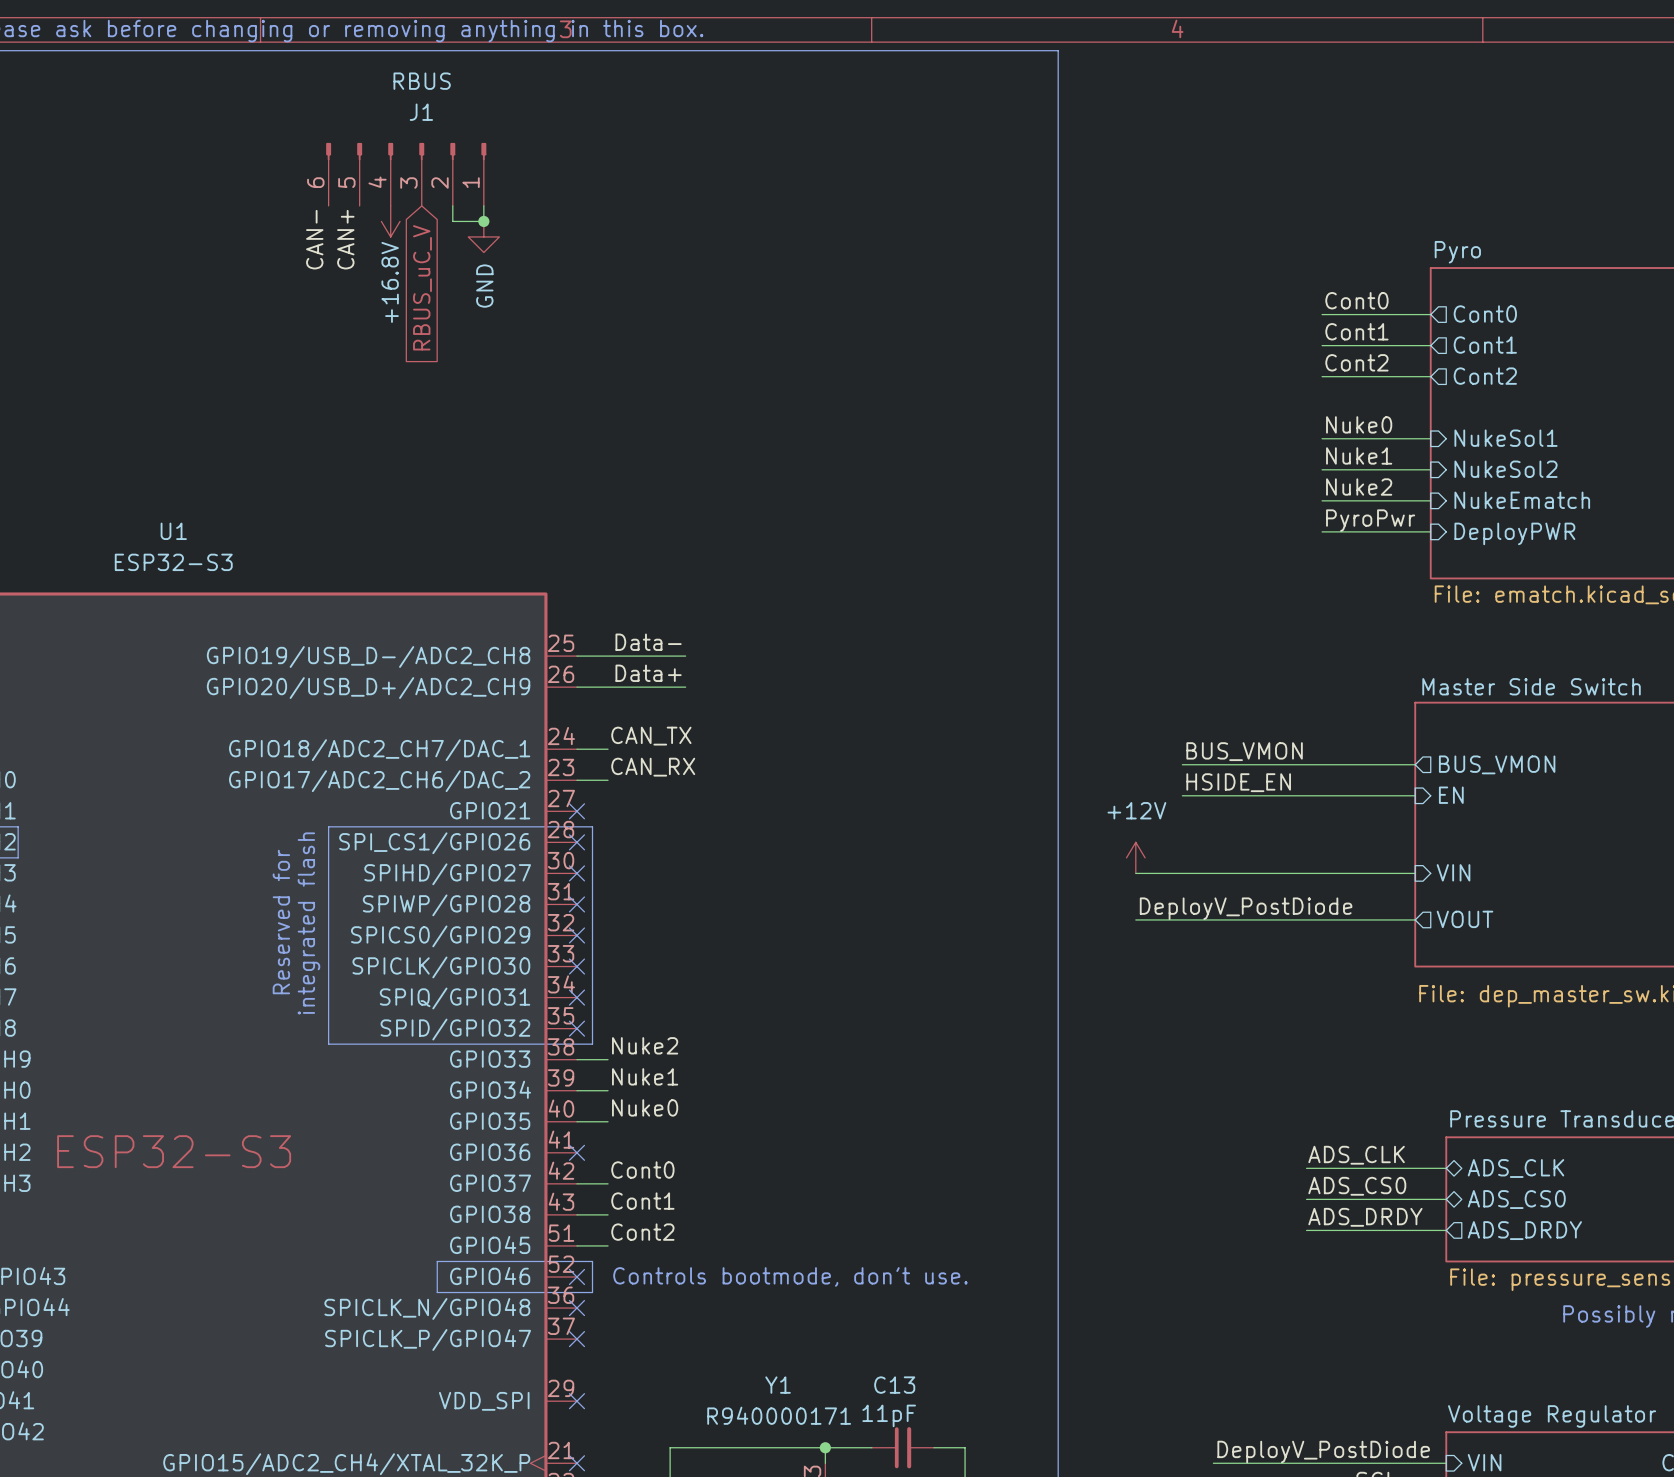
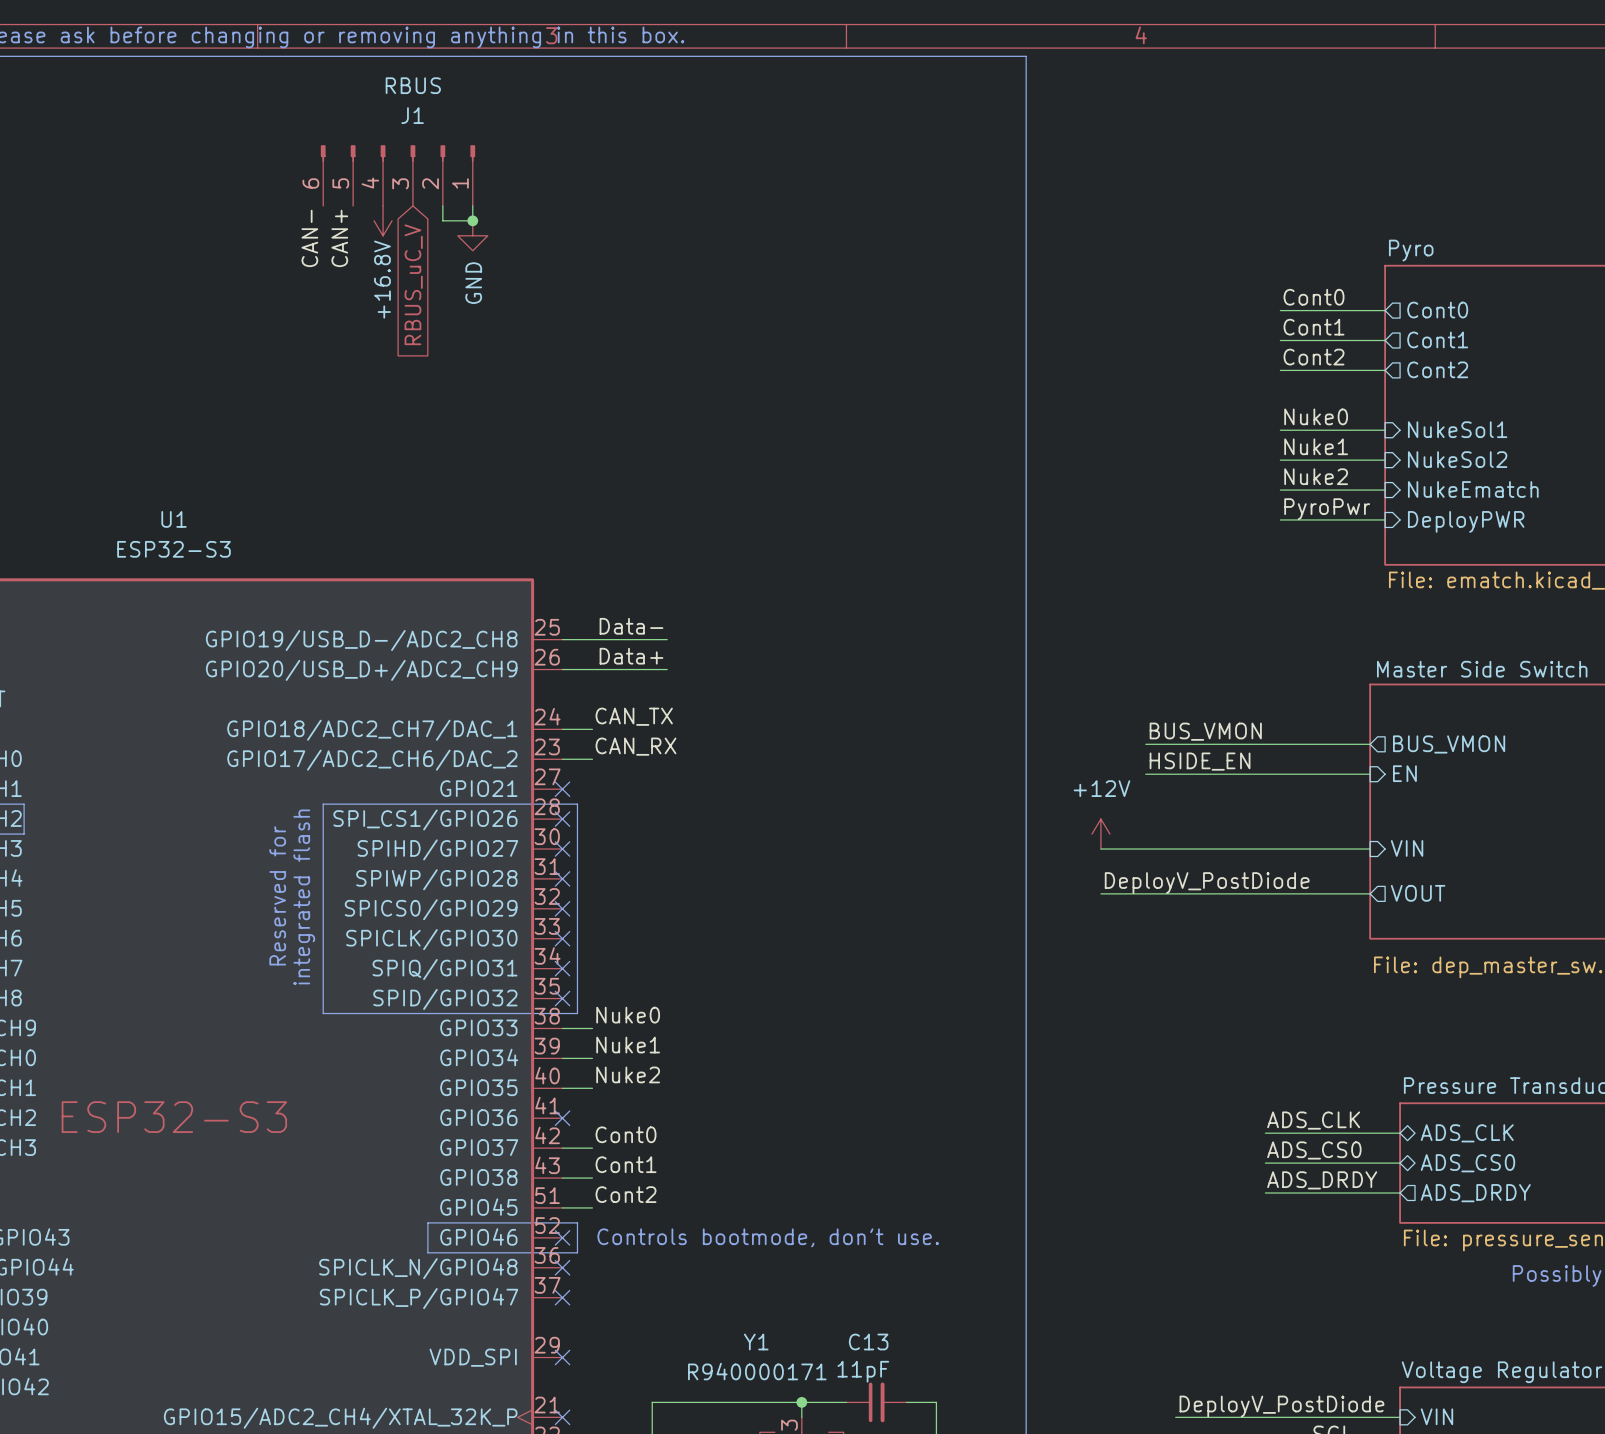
label: Nuke2 (645, 1045) -> Nuke0 (628, 1015)
label: Nuke0 (645, 1107) -> Nuke2 (628, 1074)

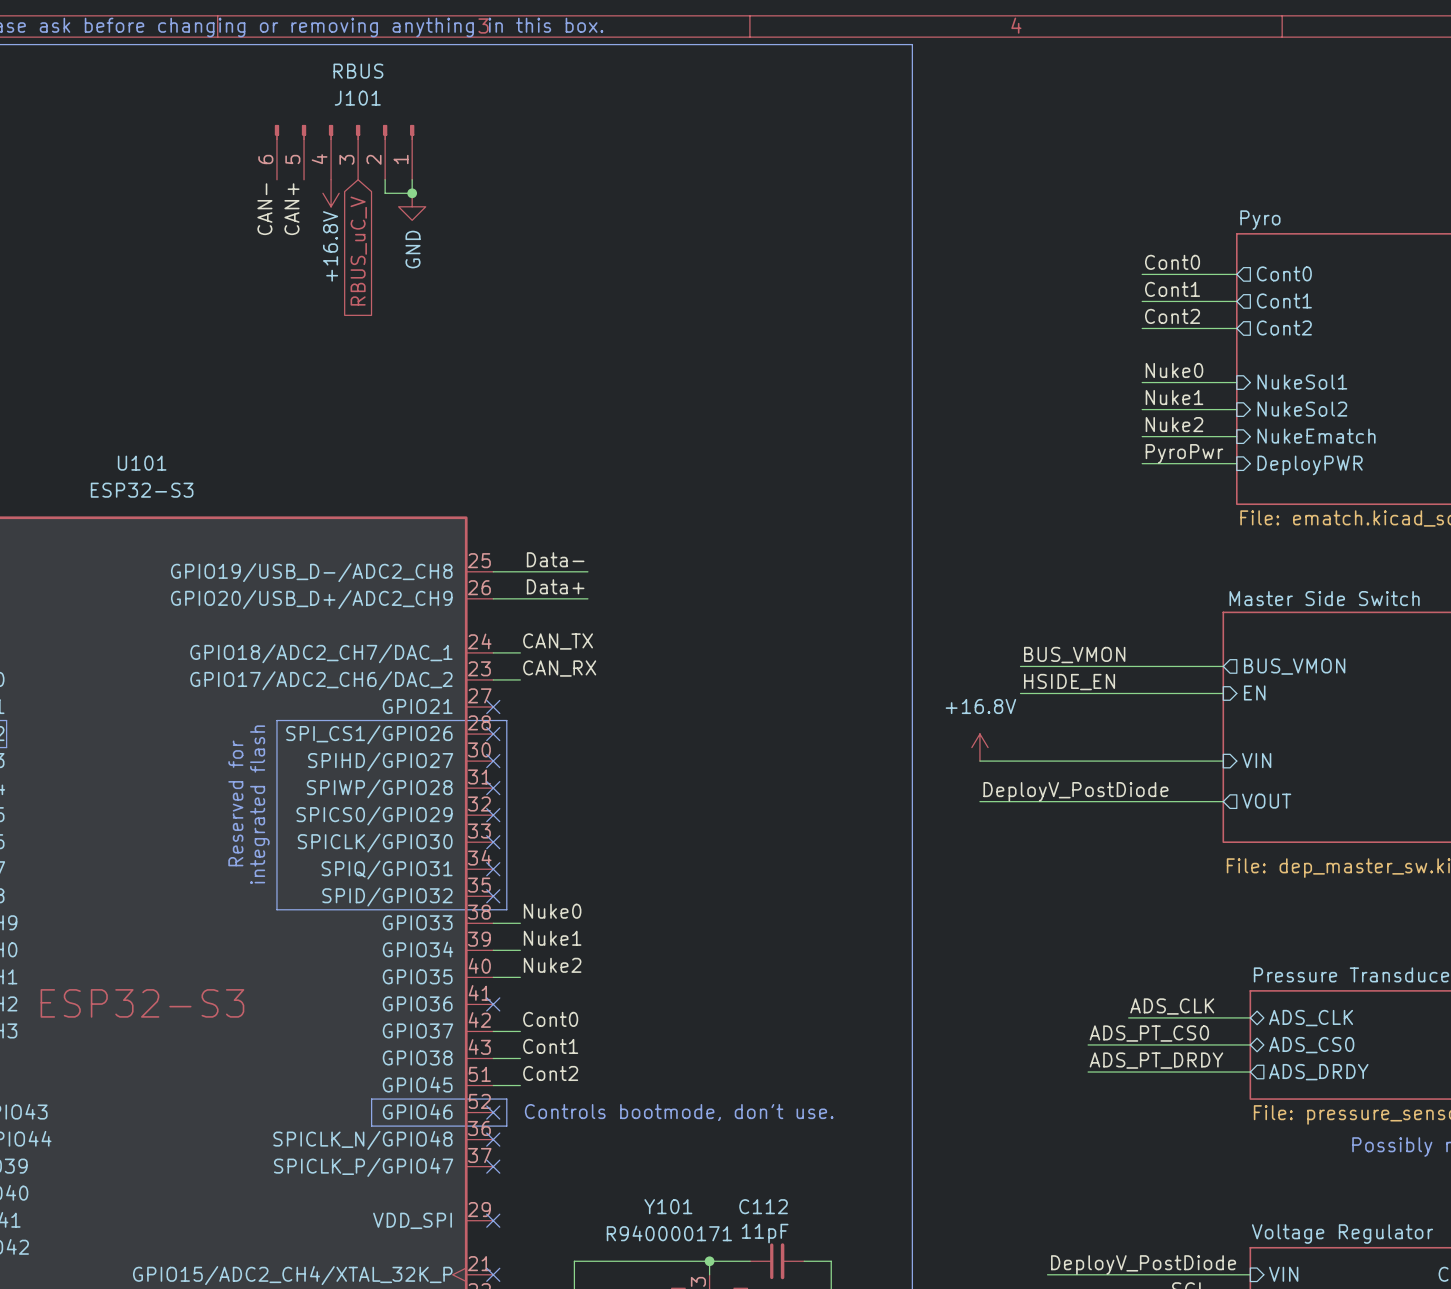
J1 name: J1 (412, 115) -> J101 (357, 98)
U1 name: U1 (174, 519) -> U101 (142, 463)
power symbol: +12V (1100, 834) -> +16.8V (979, 747)
label: ADS_CS0 (1314, 1150) -> ADS_PT_CS0 (1149, 1033)
wire: none -> (1088, 1044) (1128, 1044)
label: ADS_DRDY (1322, 1180) -> ADS_PT_DRDY (1156, 1060)
wire: none -> (1088, 1072) (1128, 1072)
Y1 name: Y1 (756, 1342) -> Y101 (668, 1206)
C13 name: C13 (868, 1342) -> C112 (763, 1206)

